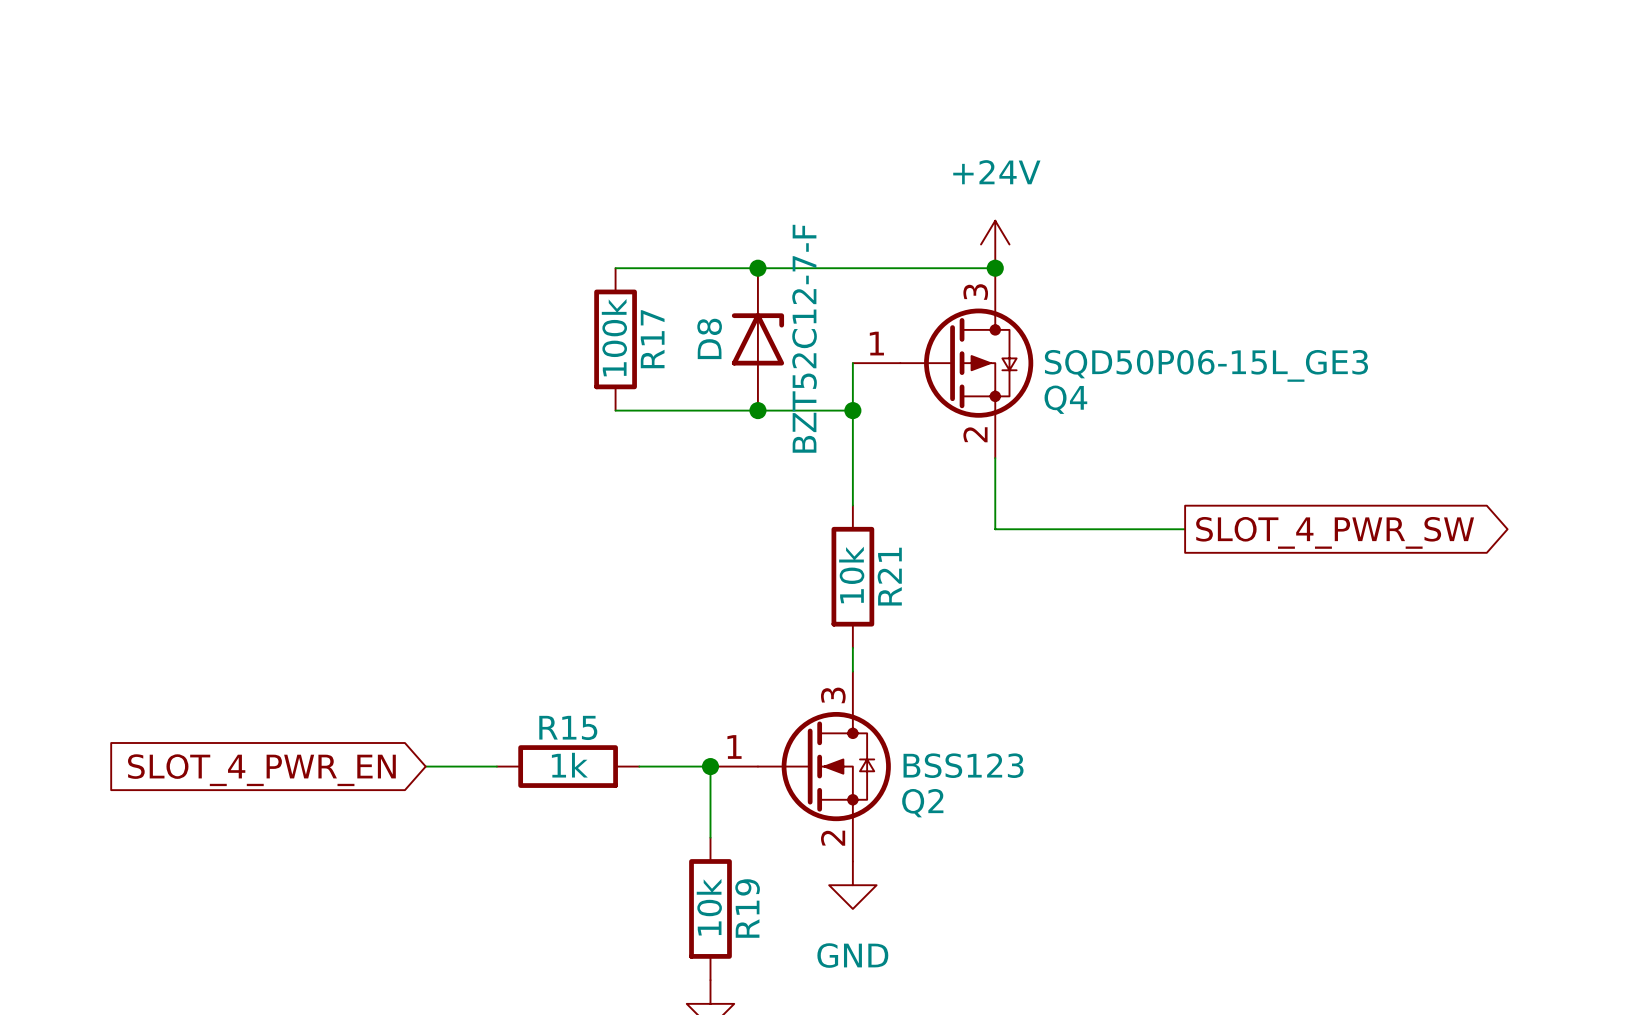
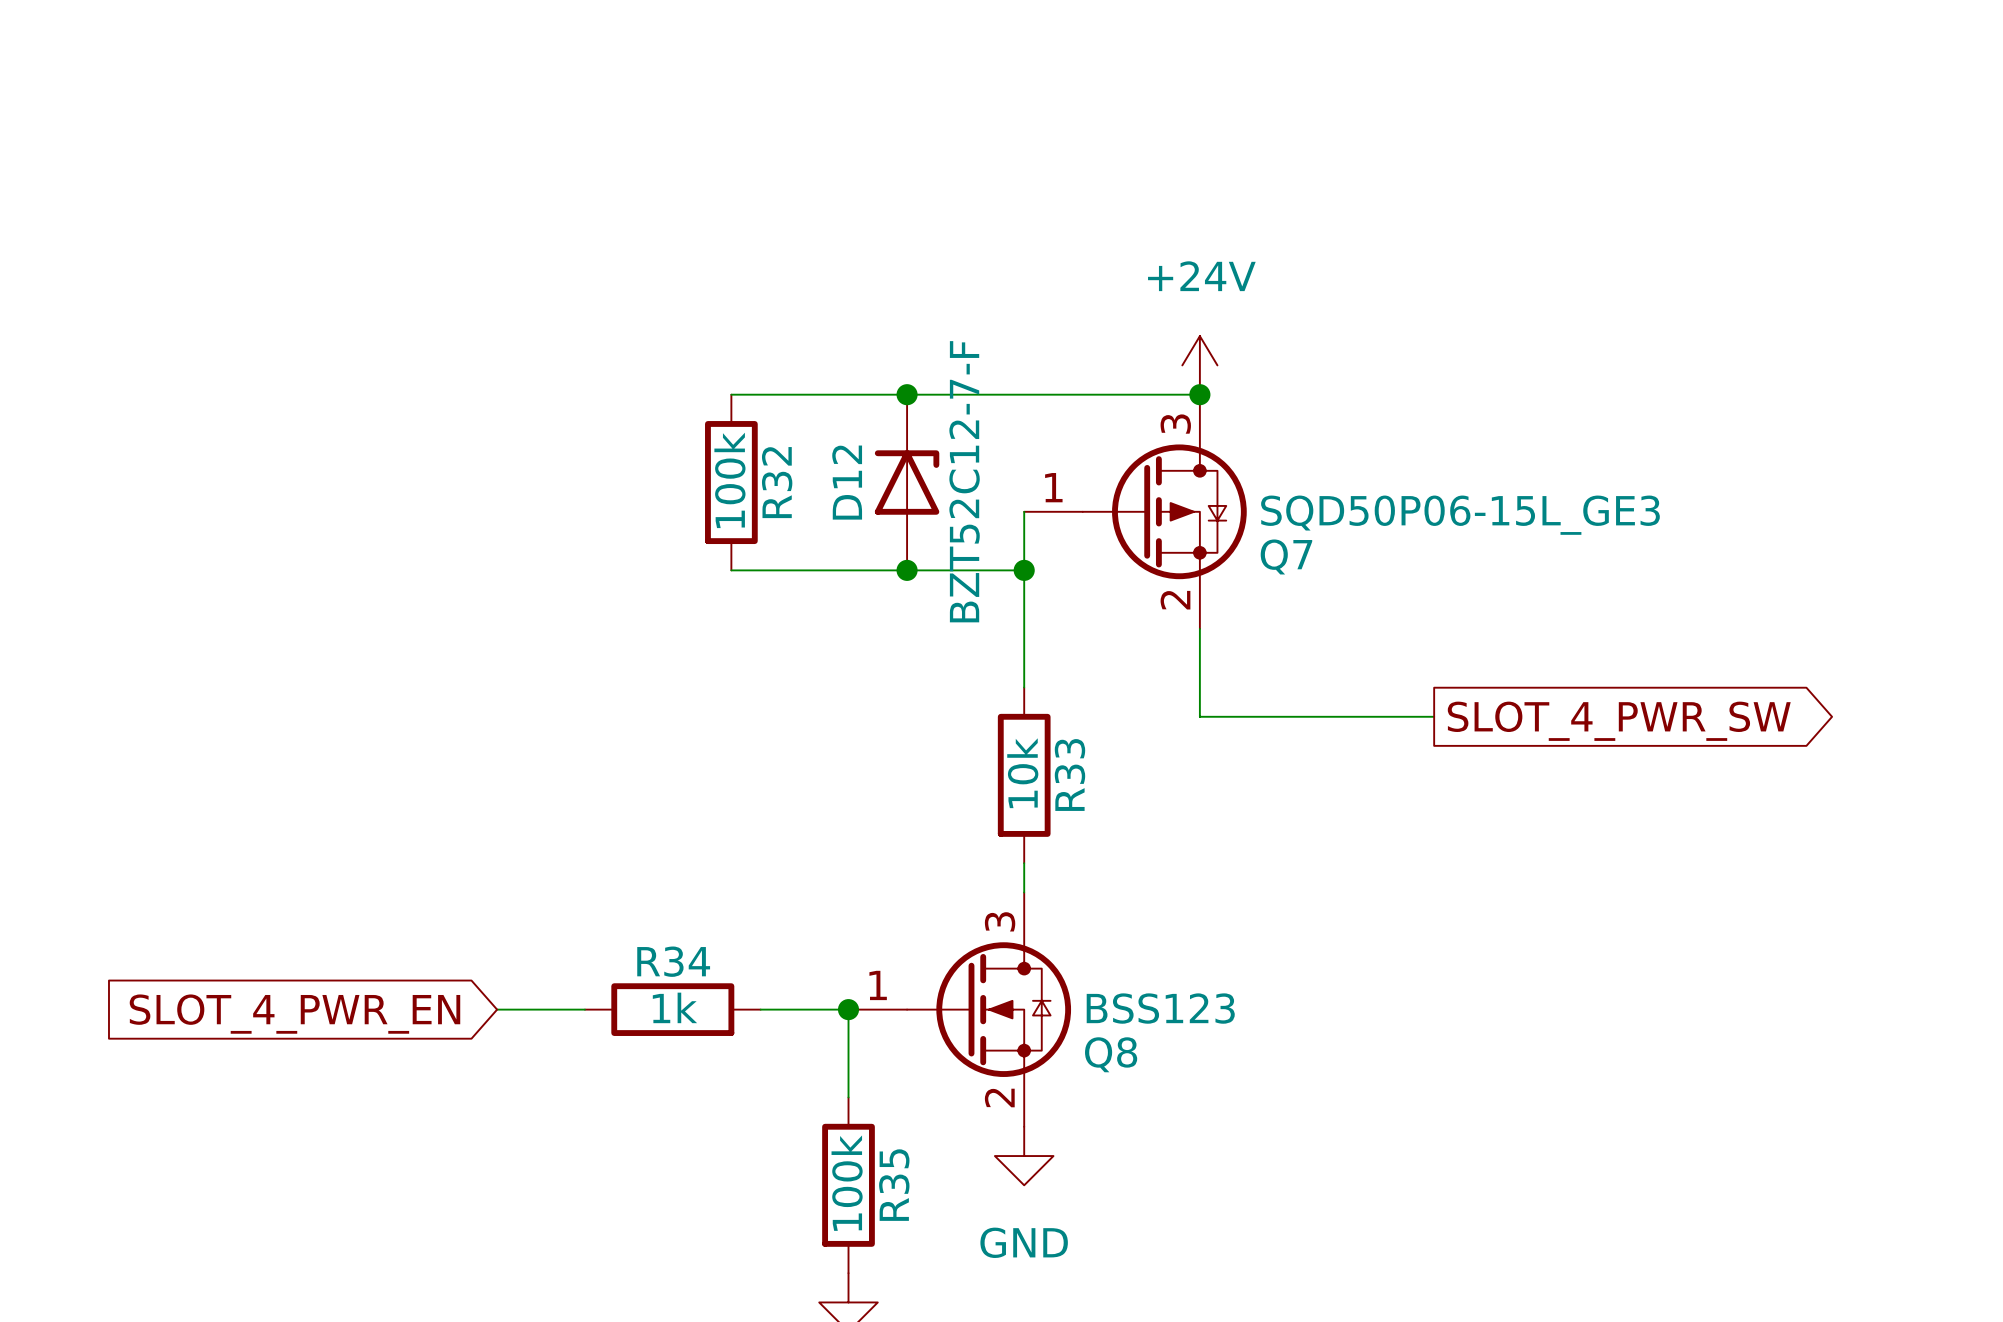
D8 name: D8 (709, 338) -> D12 (847, 482)
R17 name: R17 (652, 339) -> R32 (777, 482)
Q4 name: Q4 (1065, 399) -> Q7 (1286, 556)
R21 name: R21 (889, 576) -> R33 (1069, 775)
R15 name: R15 (568, 727) -> R34 (673, 961)
Q2 name: Q2 (922, 803) -> Q8 (1111, 1054)
R19 value: 10k (709, 907) -> 100k (847, 1183)
R19 name: R19 (747, 908) -> R35 (894, 1185)

